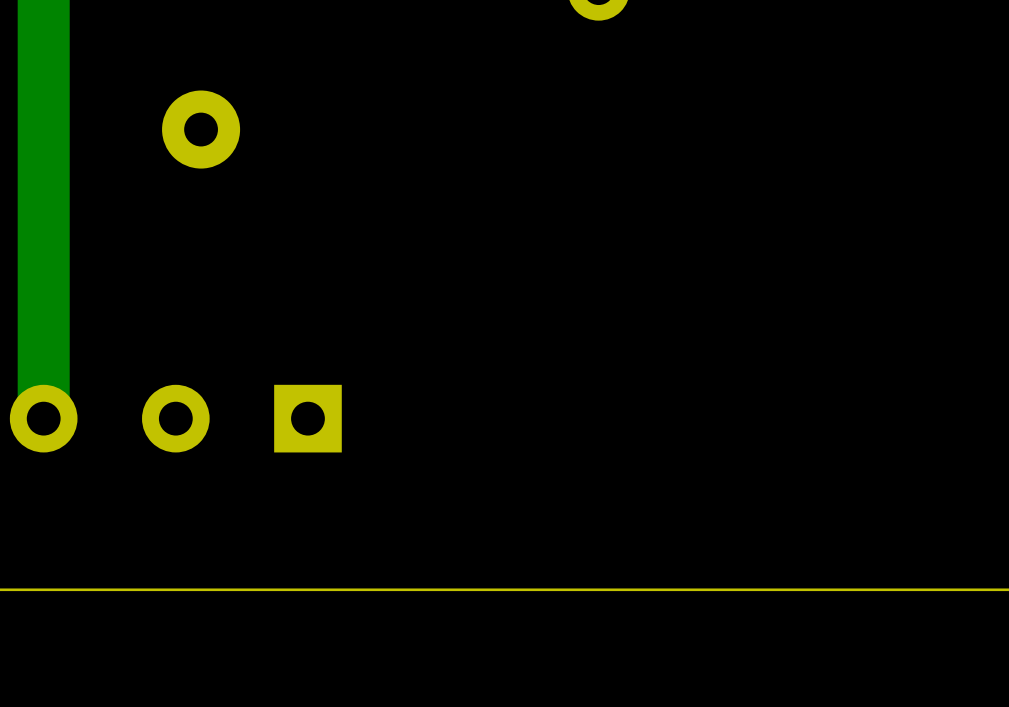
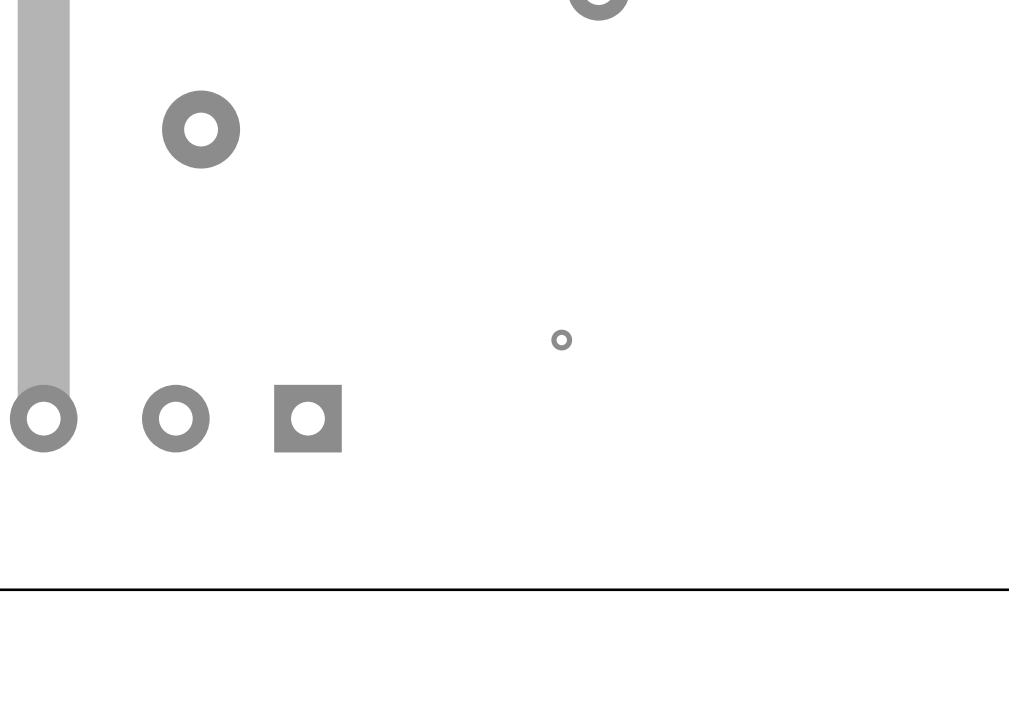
via: none -> (561, 340)

